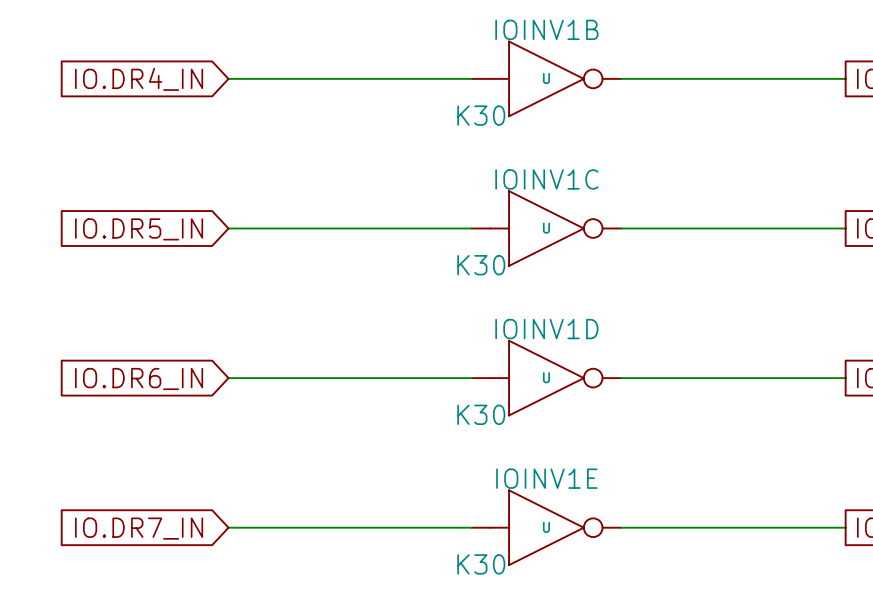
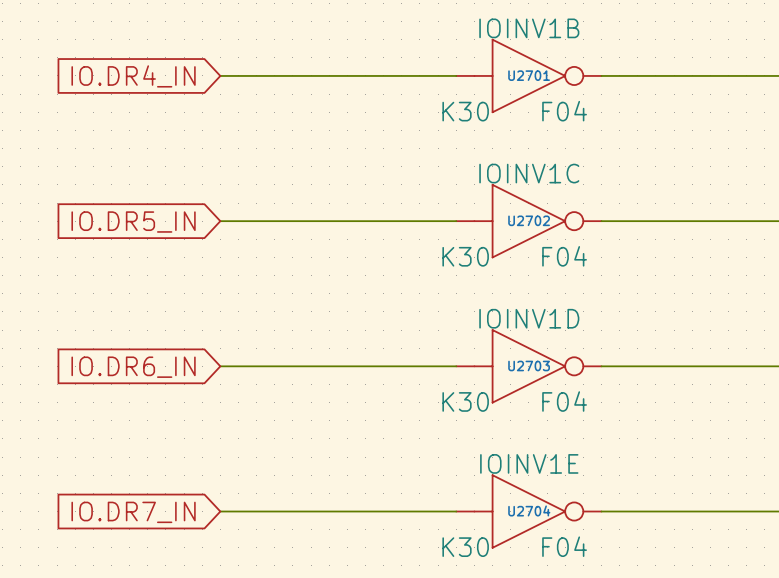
U name: U (546, 78) -> U2701 (529, 75)
U value: none -> F04 (564, 111)
U name: U (546, 228) -> U2702 (529, 220)
U value: none -> F04 (564, 256)
U name: U (546, 377) -> U2703 (529, 365)
U value: none -> F04 (564, 401)
U name: U (546, 527) -> U2704 (529, 510)
U value: none -> F04 (564, 546)

